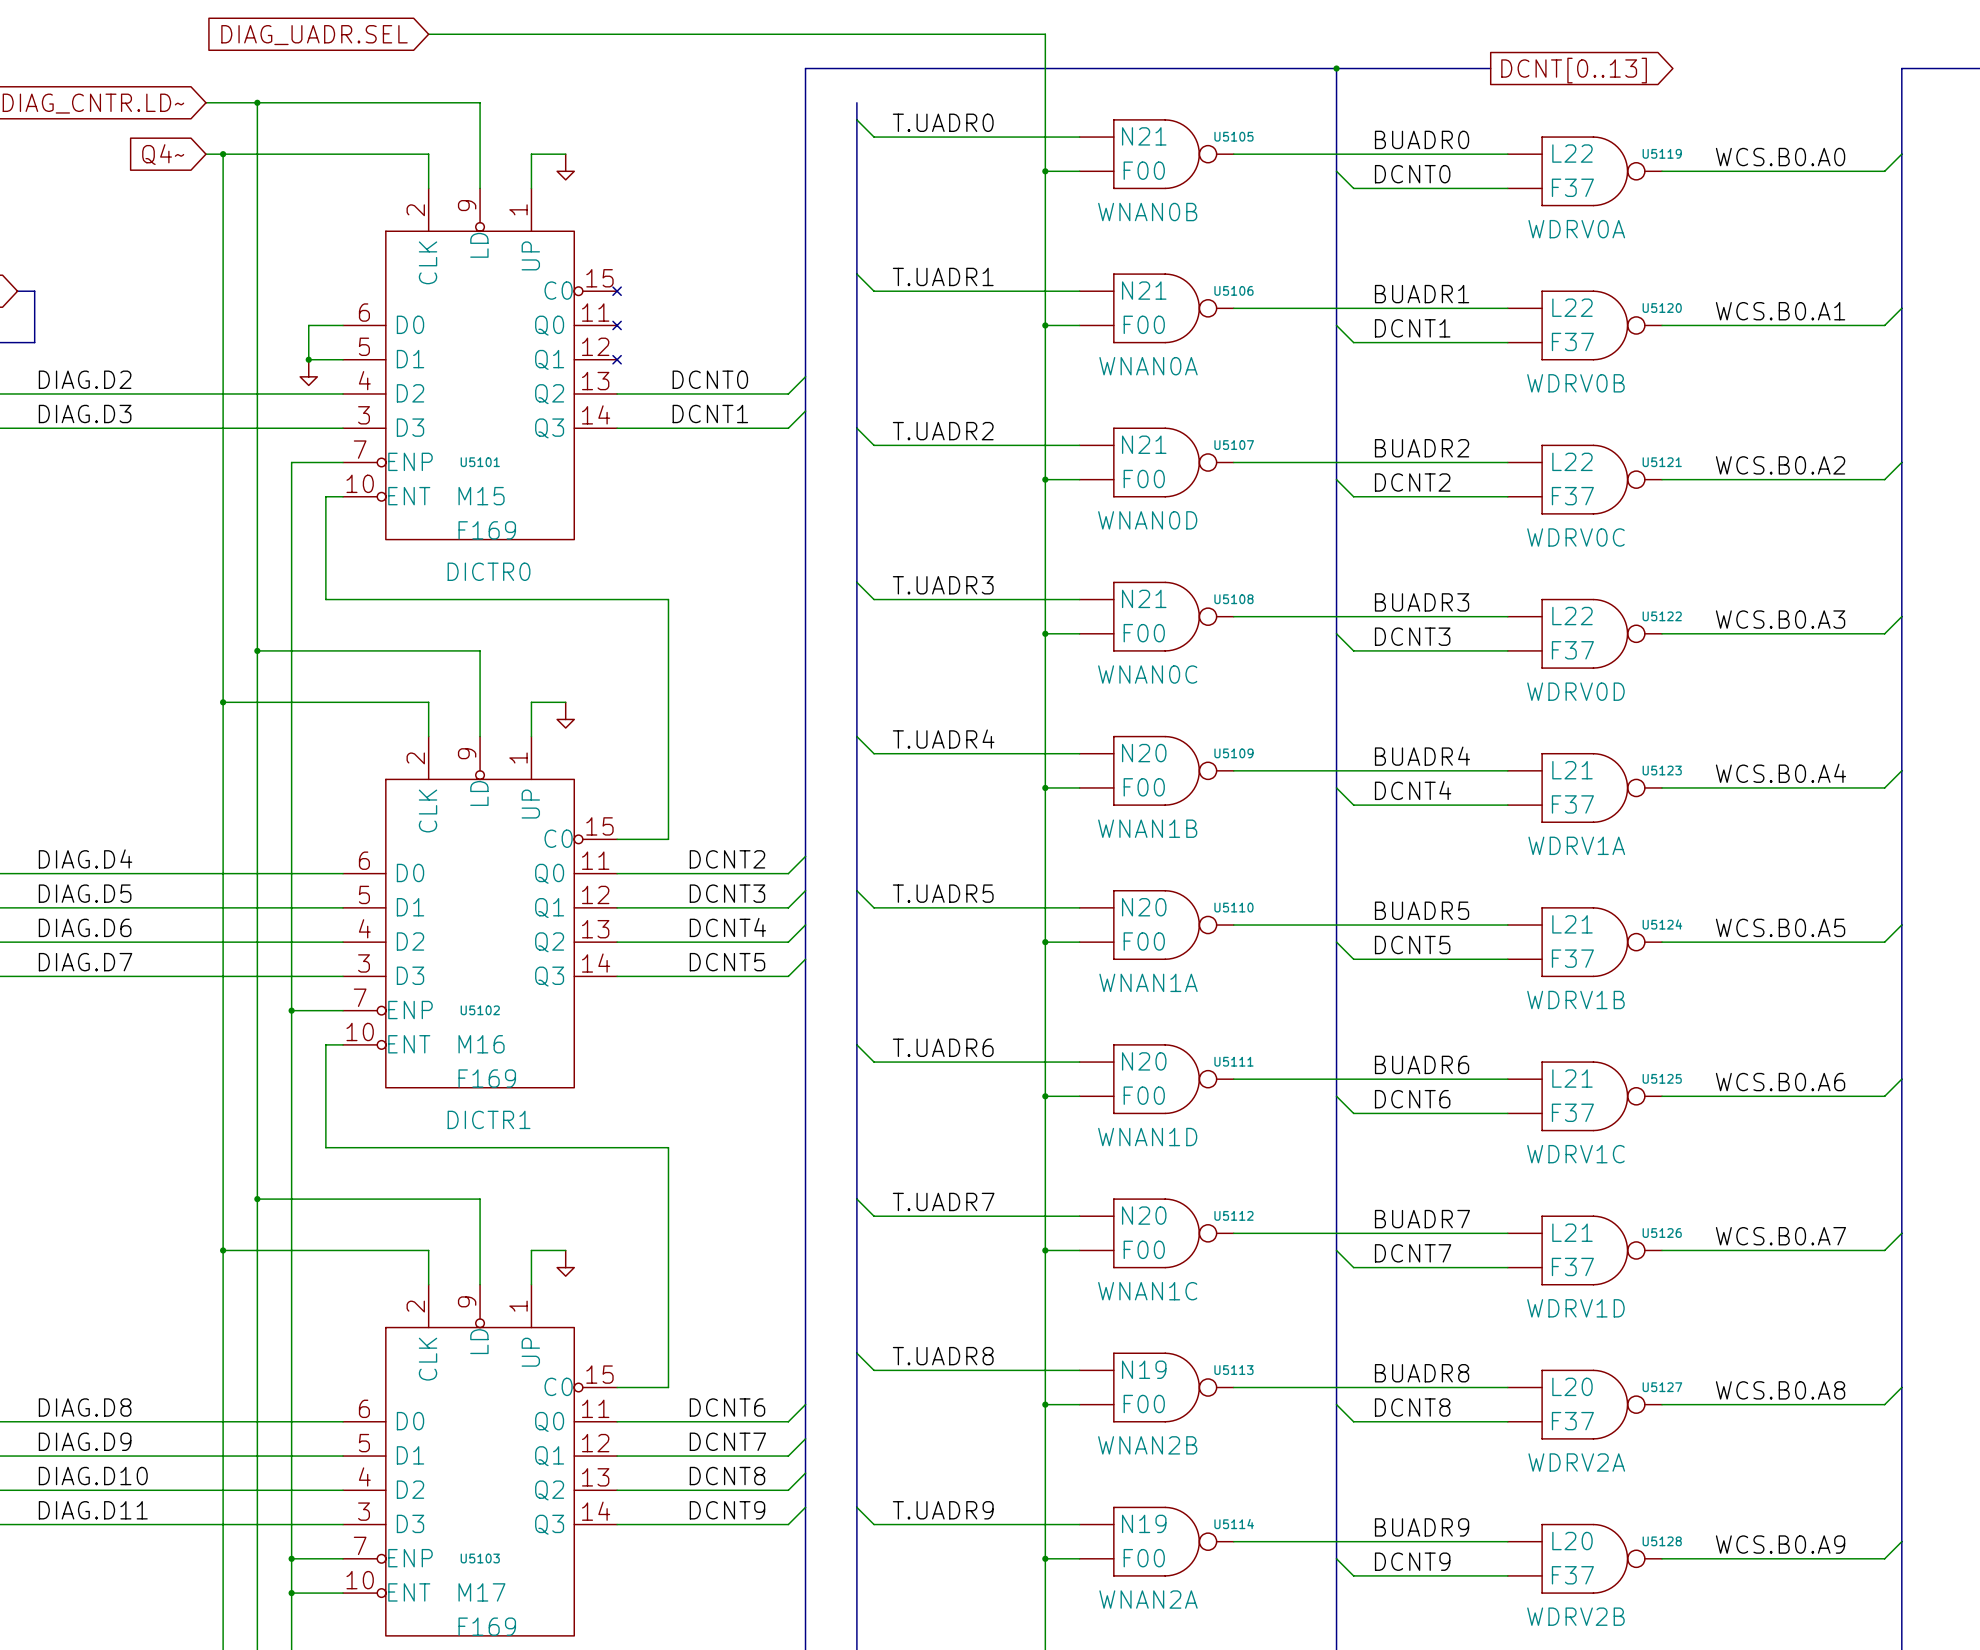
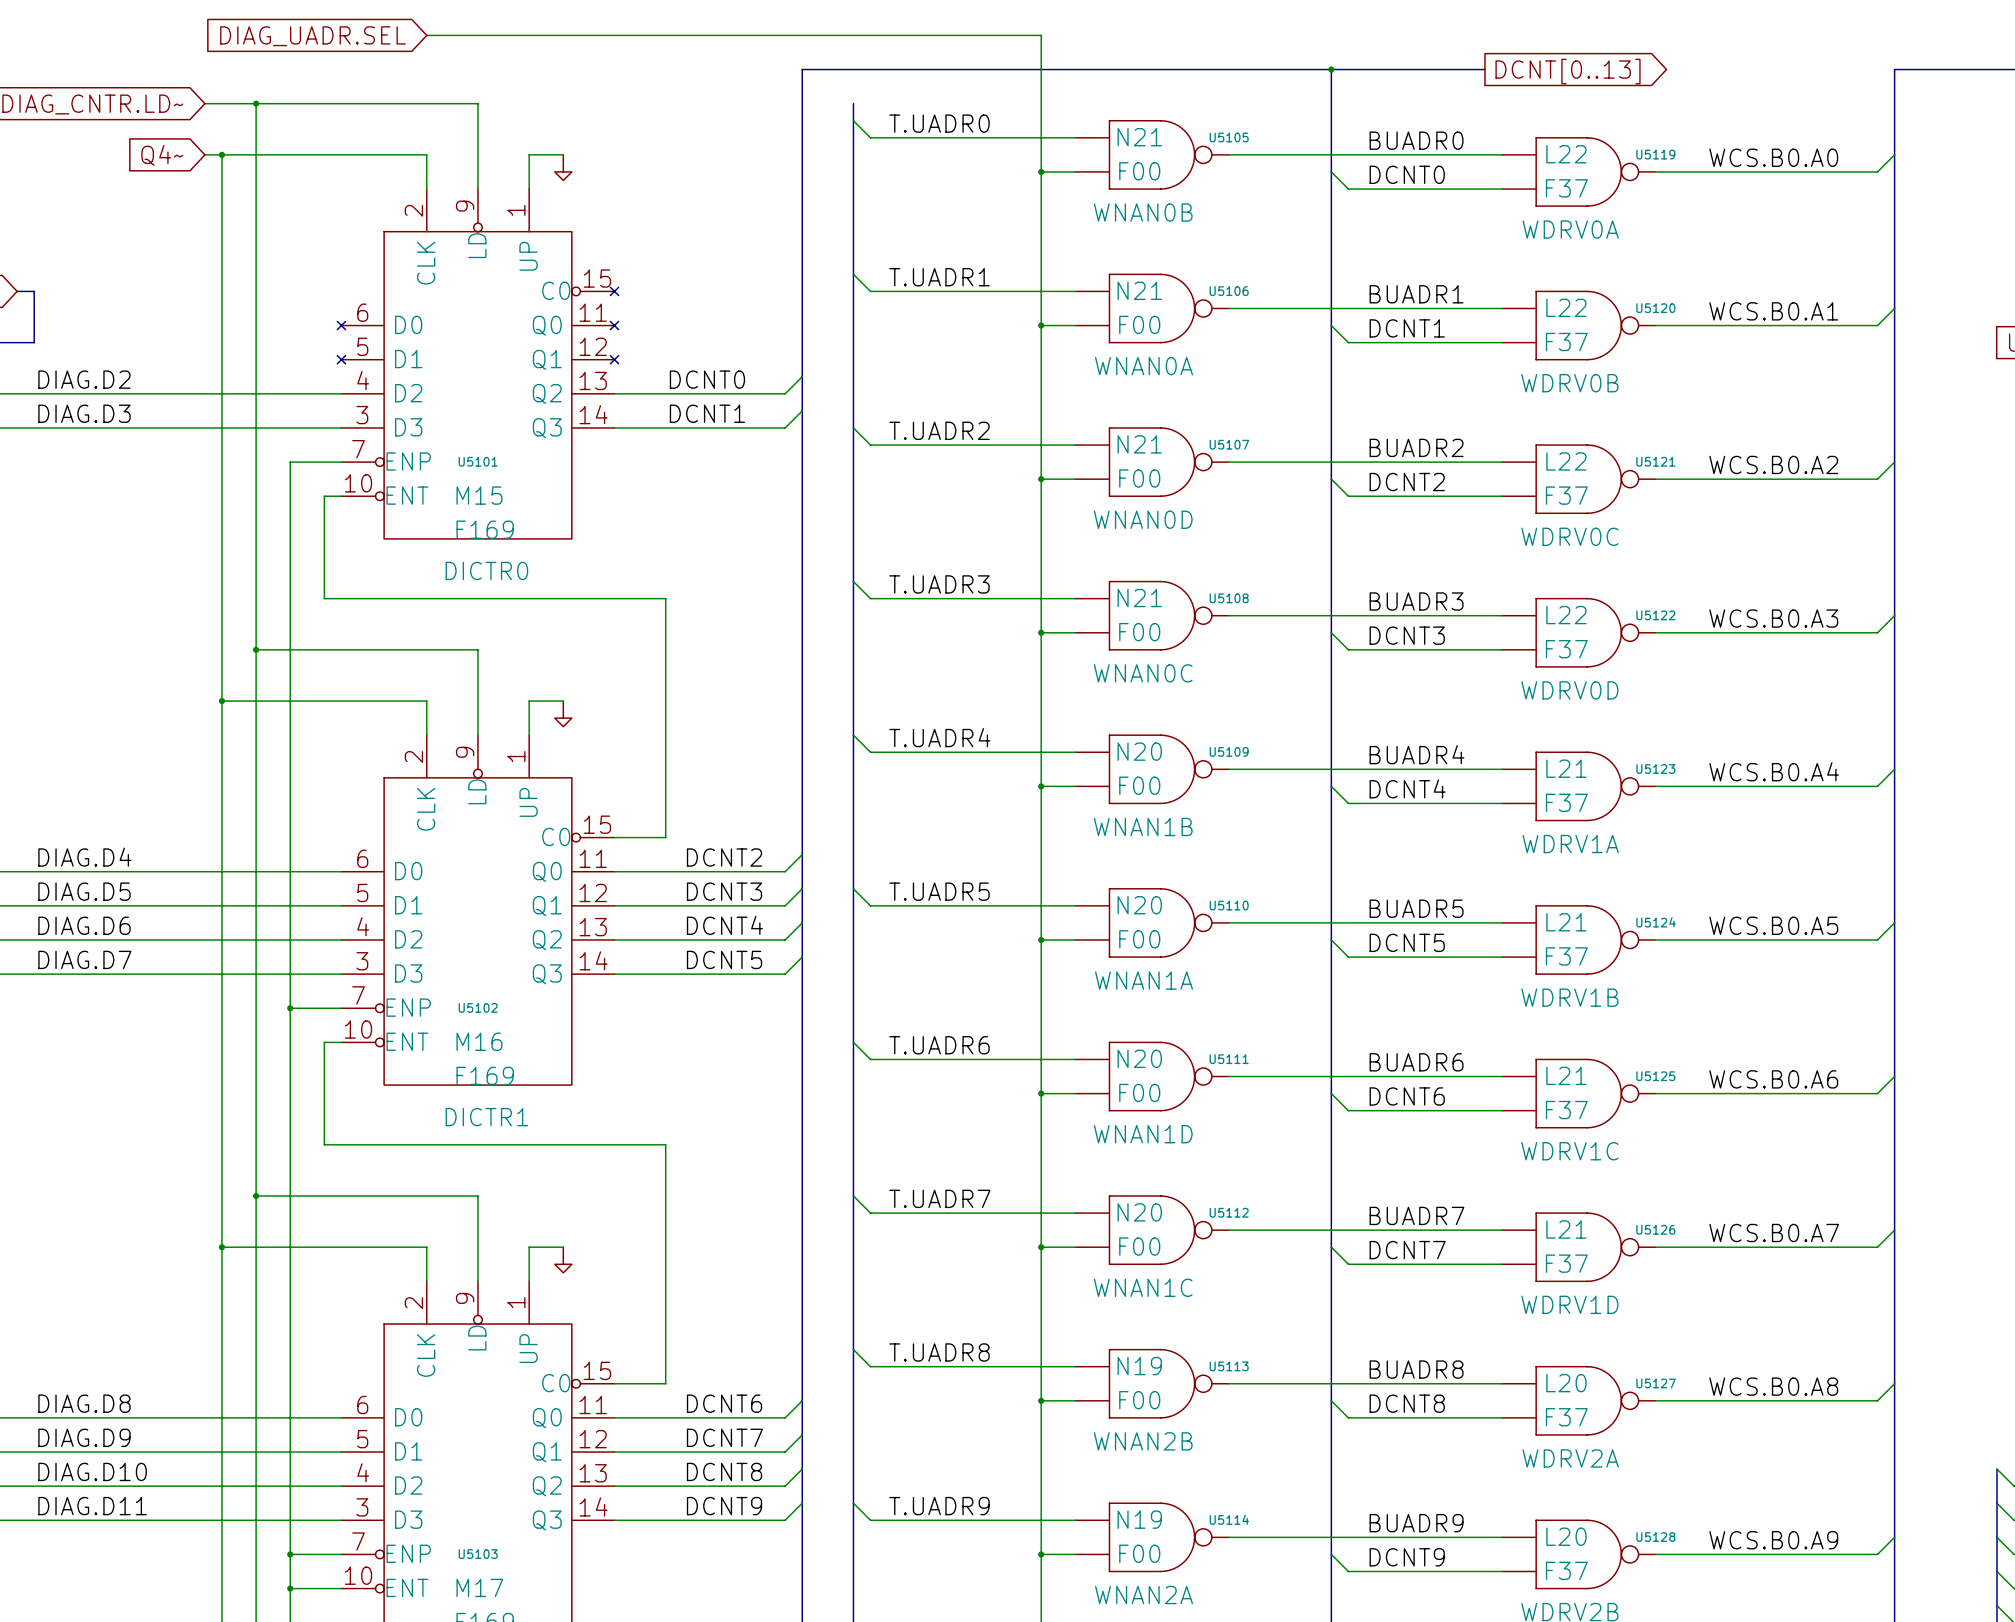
wire: (343, 325) (308, 325) (308, 359) (343, 359) -> none
no-connect mark: none -> (341, 325)
junction: (308, 359) -> none
no-connect mark: none -> (341, 359)
power symbol: (308, 372) -> none

